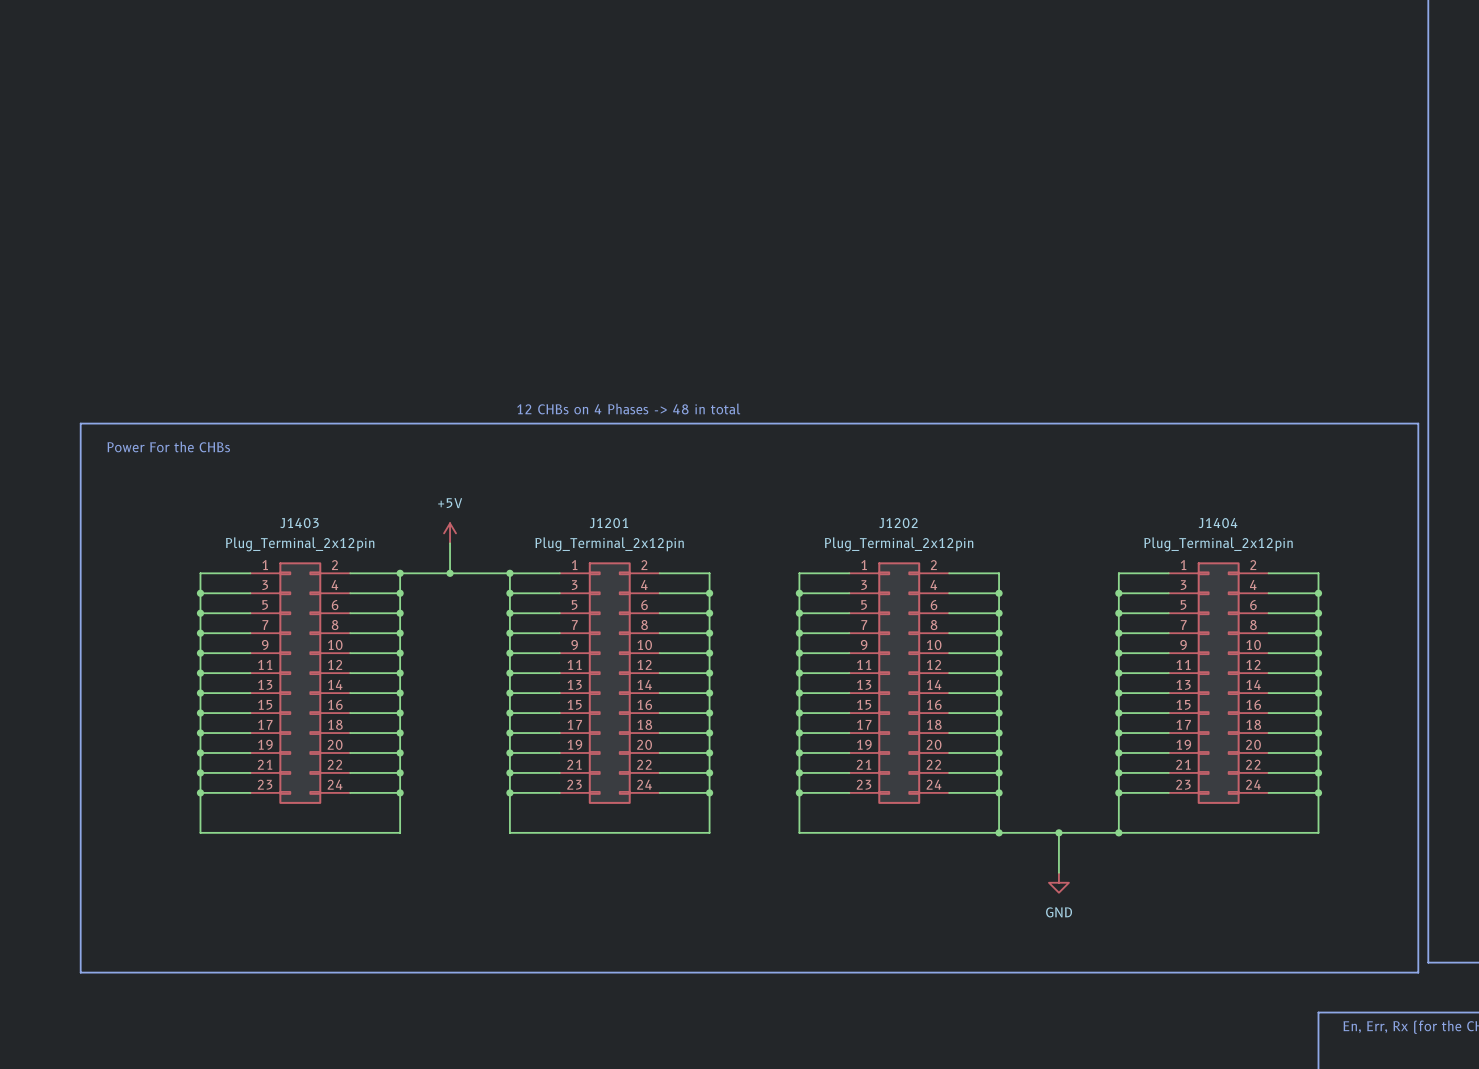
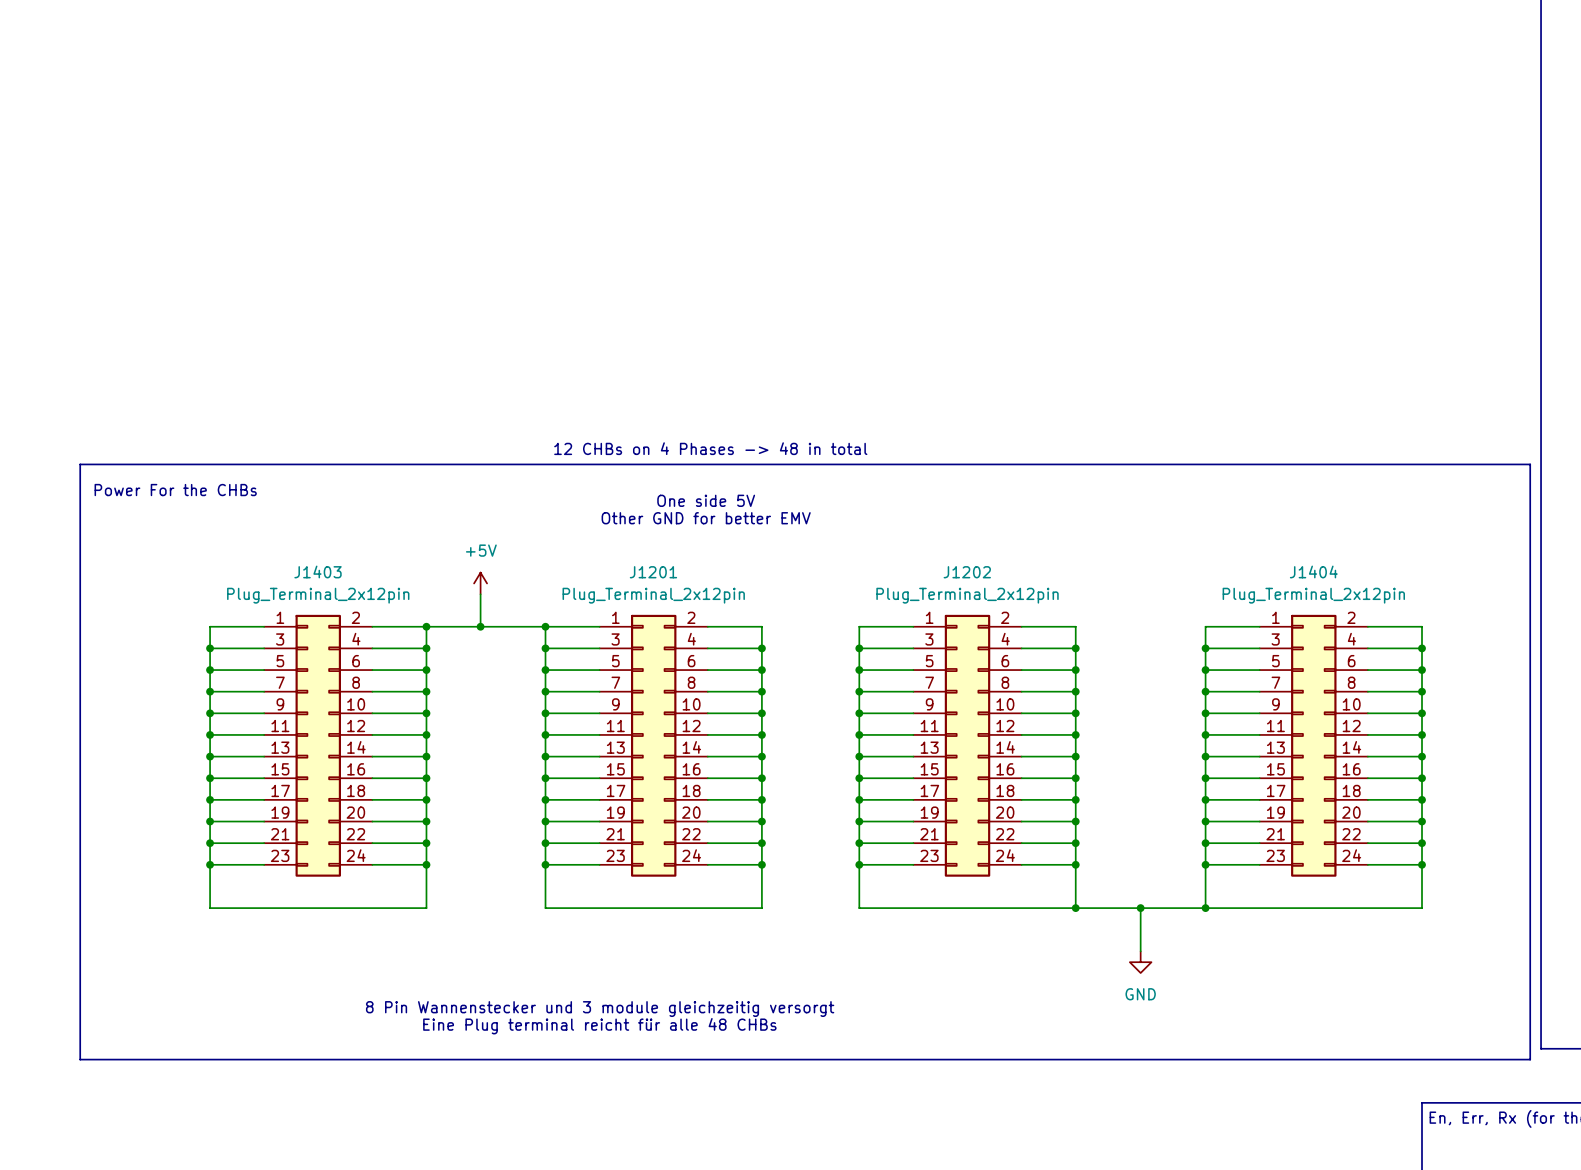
text: none -> One side 5V (706, 500)
text: none -> Other GND for better EMV (706, 518)
text: none -> 8 Pin Wannenstecker und 3 module gleichzeitig versorgt (600, 1009)
text: none -> Eine Plug terminal reicht für alle 48 CHBs (599, 1026)

